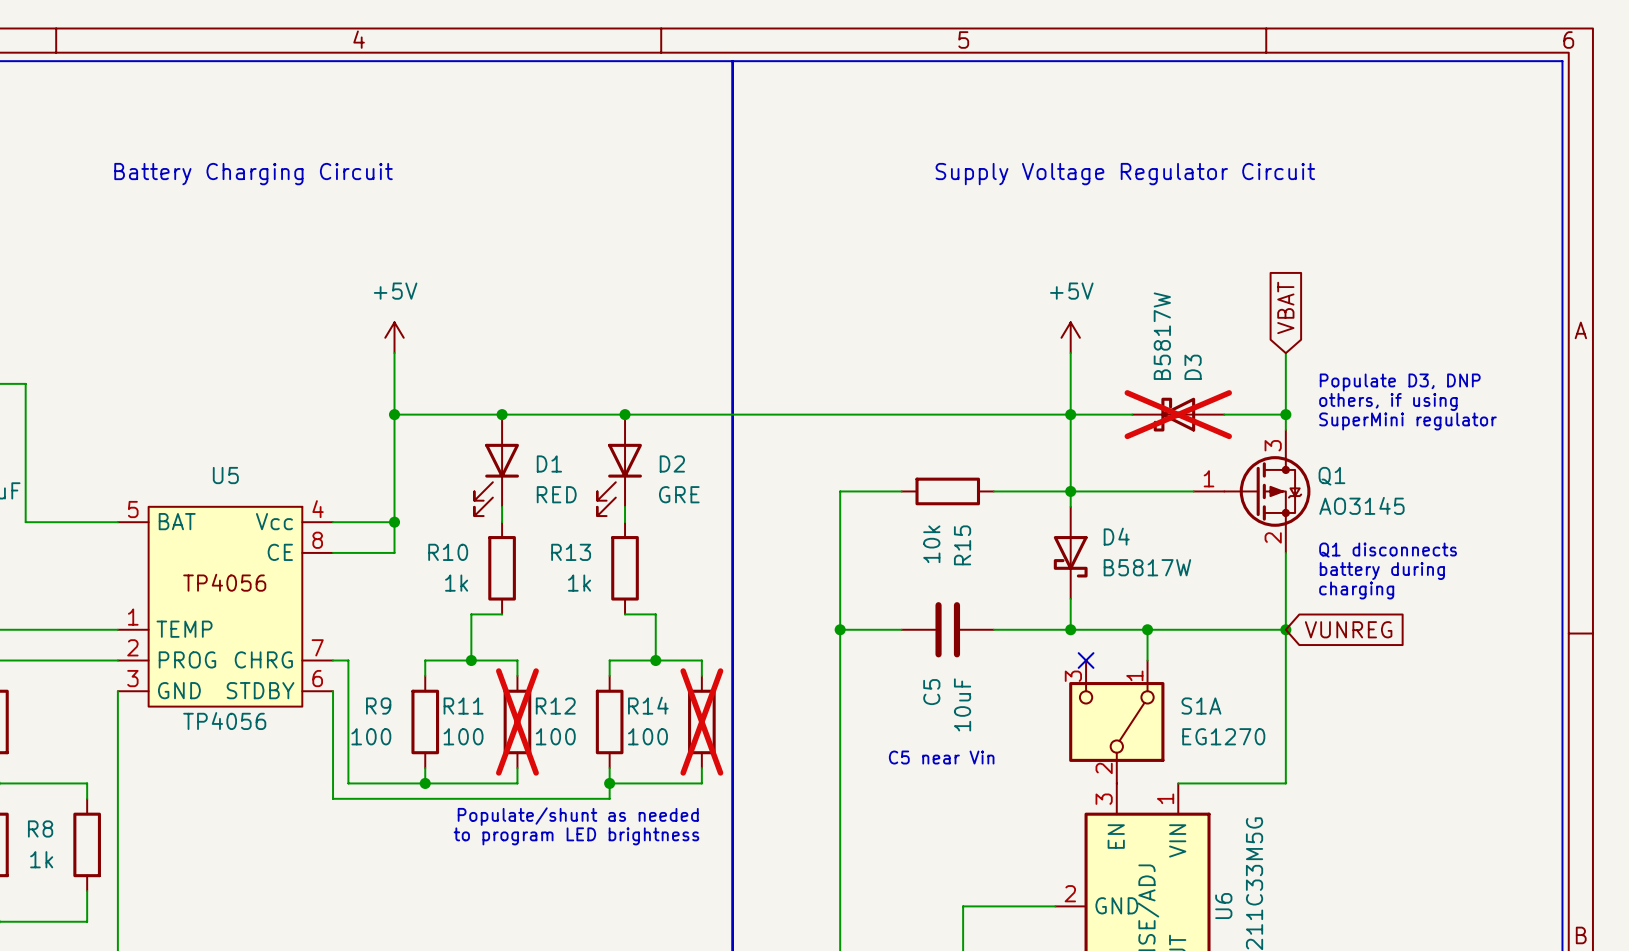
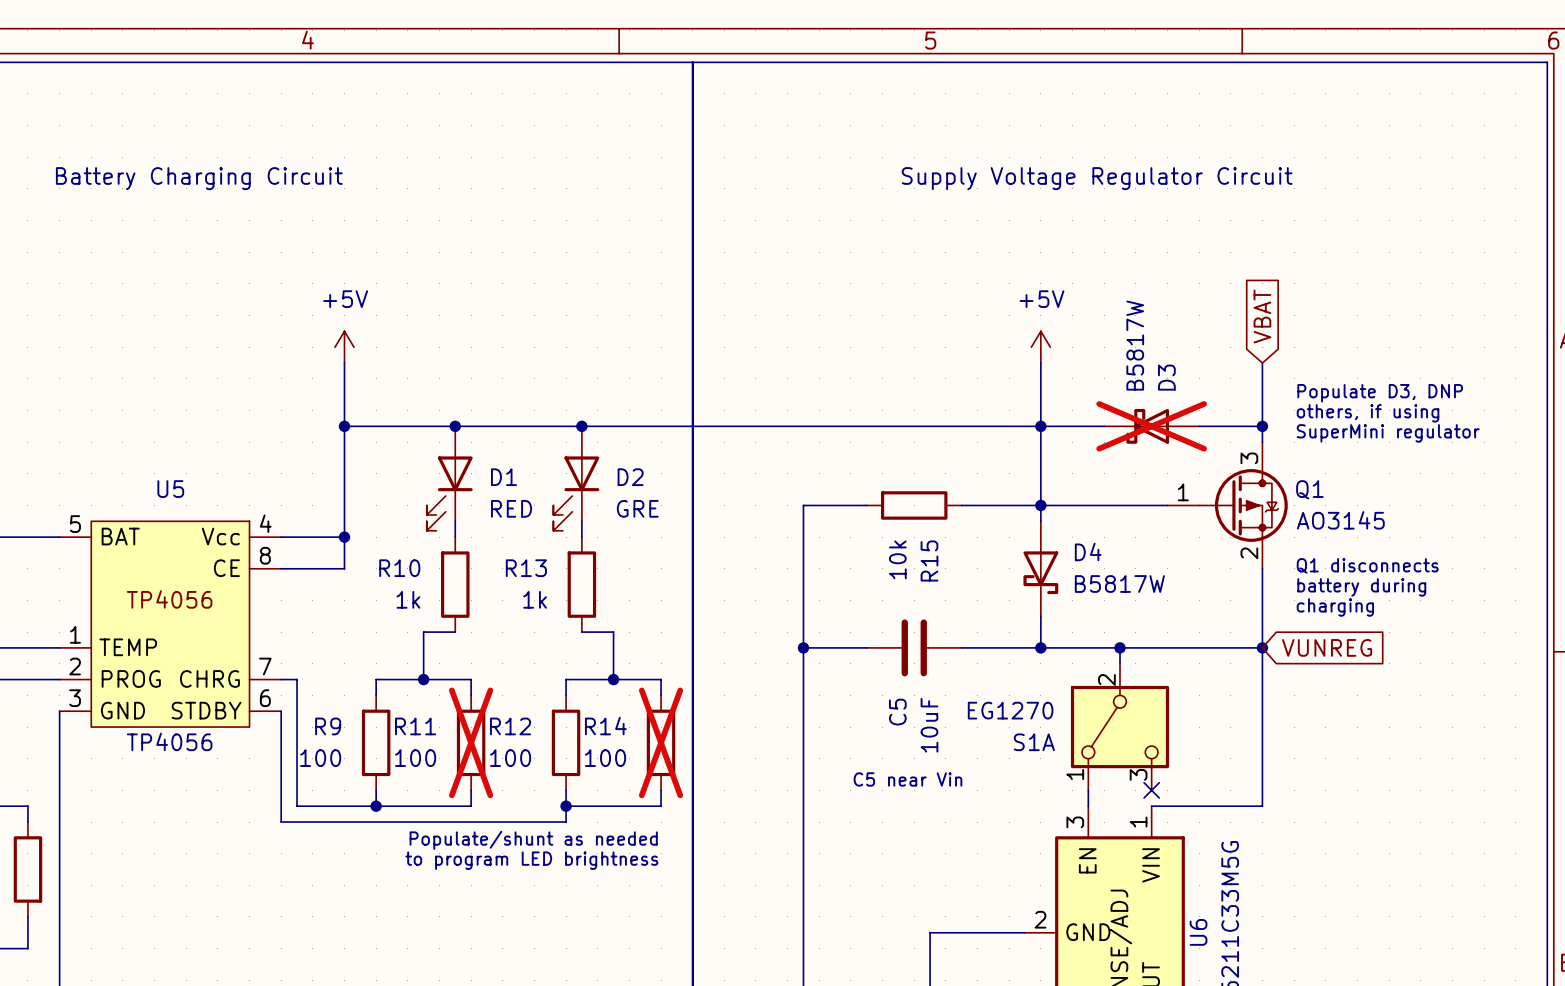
no-connect mark: (1086, 660) -> none
S1A rotation: 0° (1116, 721) -> 180° (1119, 727)
no-connect mark: none -> (1151, 790)

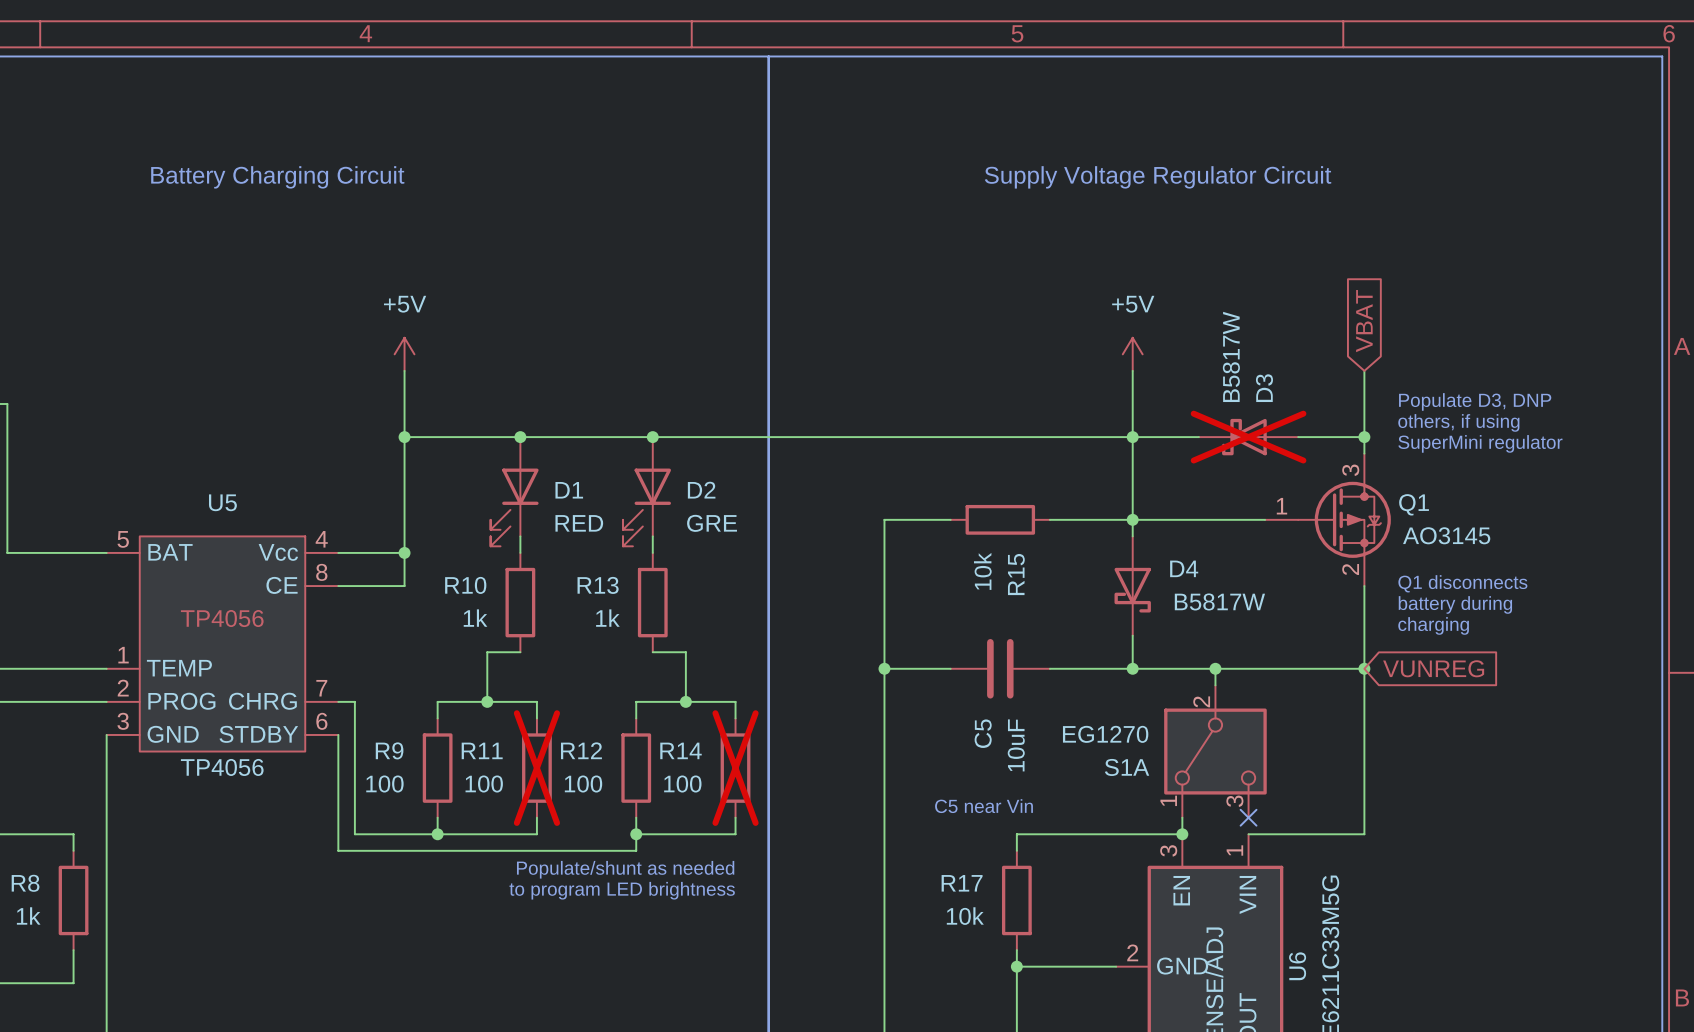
wire: none -> (1182, 834) (1016, 834) (1016, 850)
junction: none -> (1182, 834)
R17: none -> 10k (1016, 900)
wire: none -> (1016, 950) (1016, 966)
junction: none -> (1016, 966)

